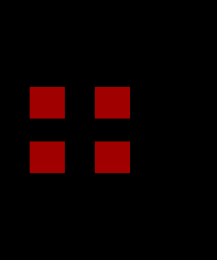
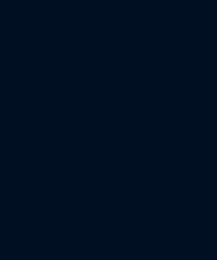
part: (79, 130) -> none

